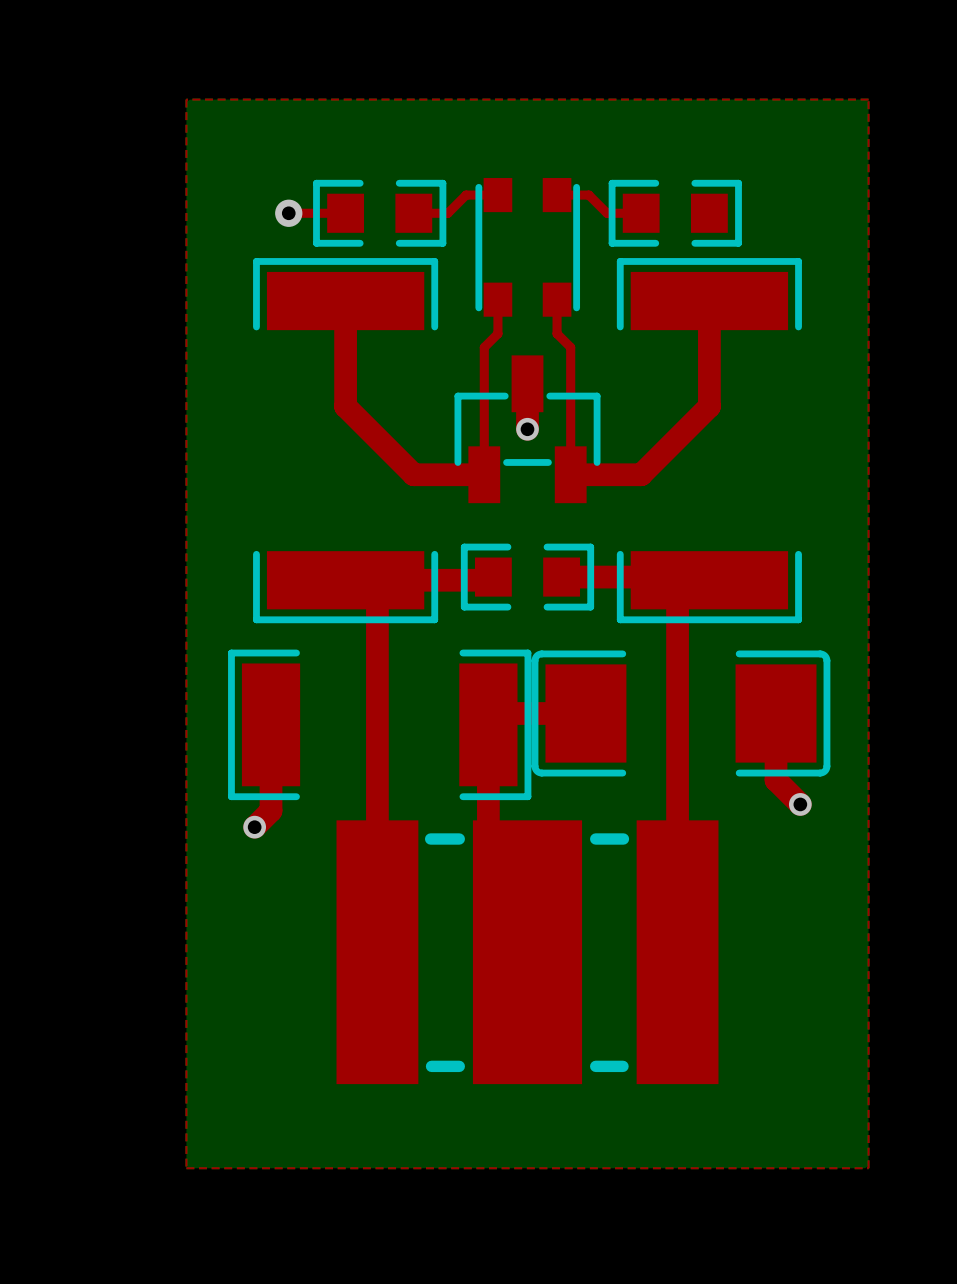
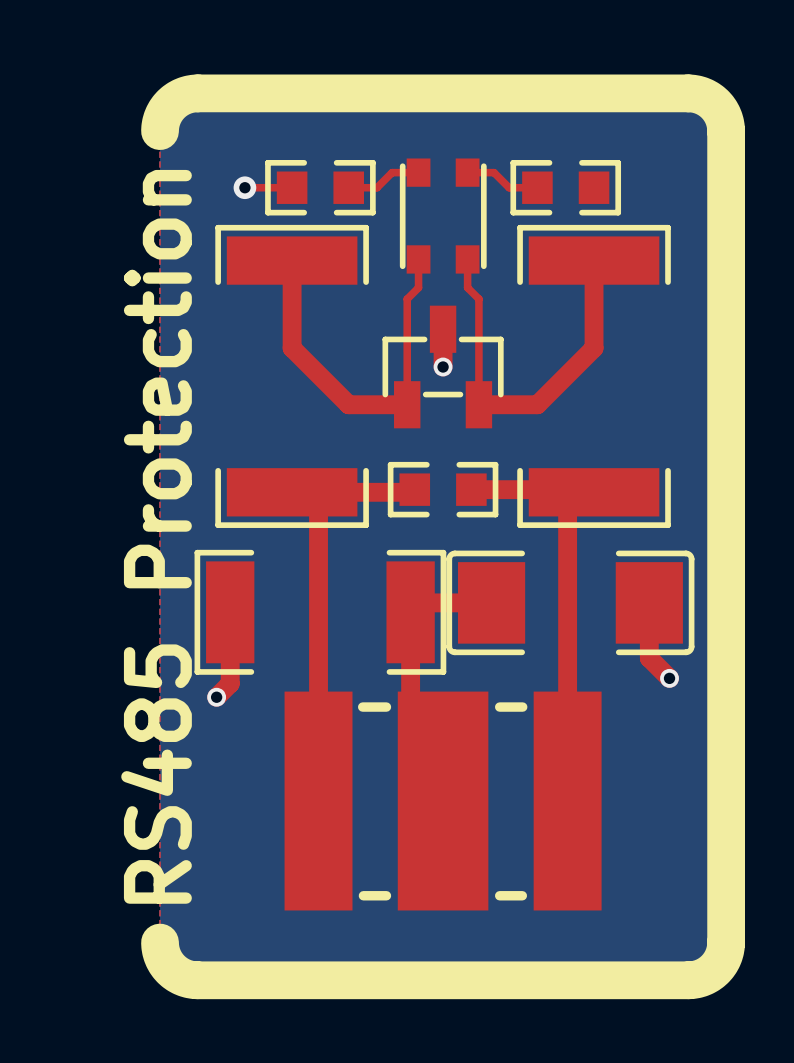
line: none -> (160, 131) (162, 118) (171, 104) (181, 97) (197, 93) (692, 93) (704, 97) (715, 104) (722, 114) (726, 131) (726, 942) (720, 962) (708, 974) (688, 980) (197, 980) (181, 976) (171, 969) (162, 955) (160, 942)
text: none -> RS485 Protection (156, 536)

